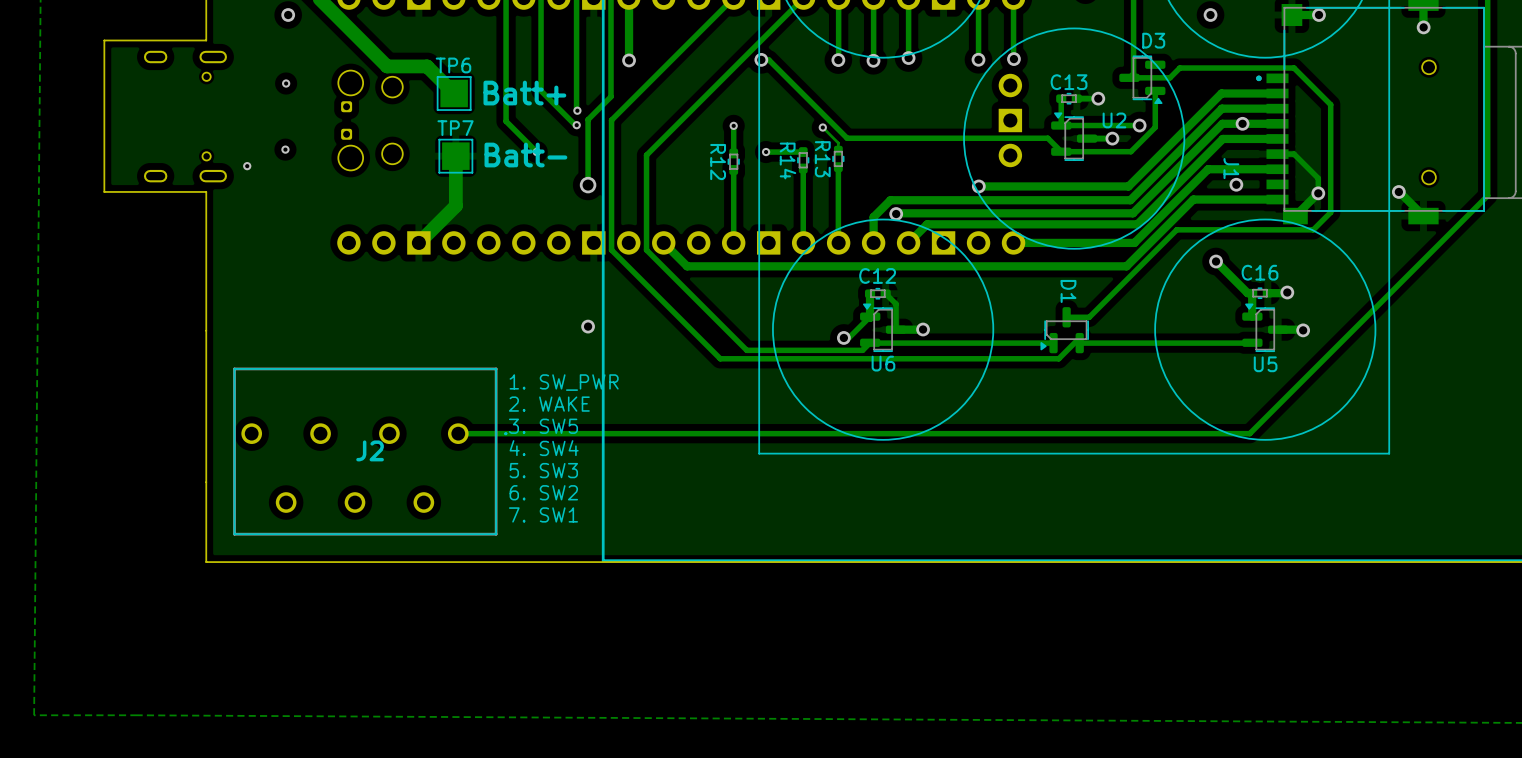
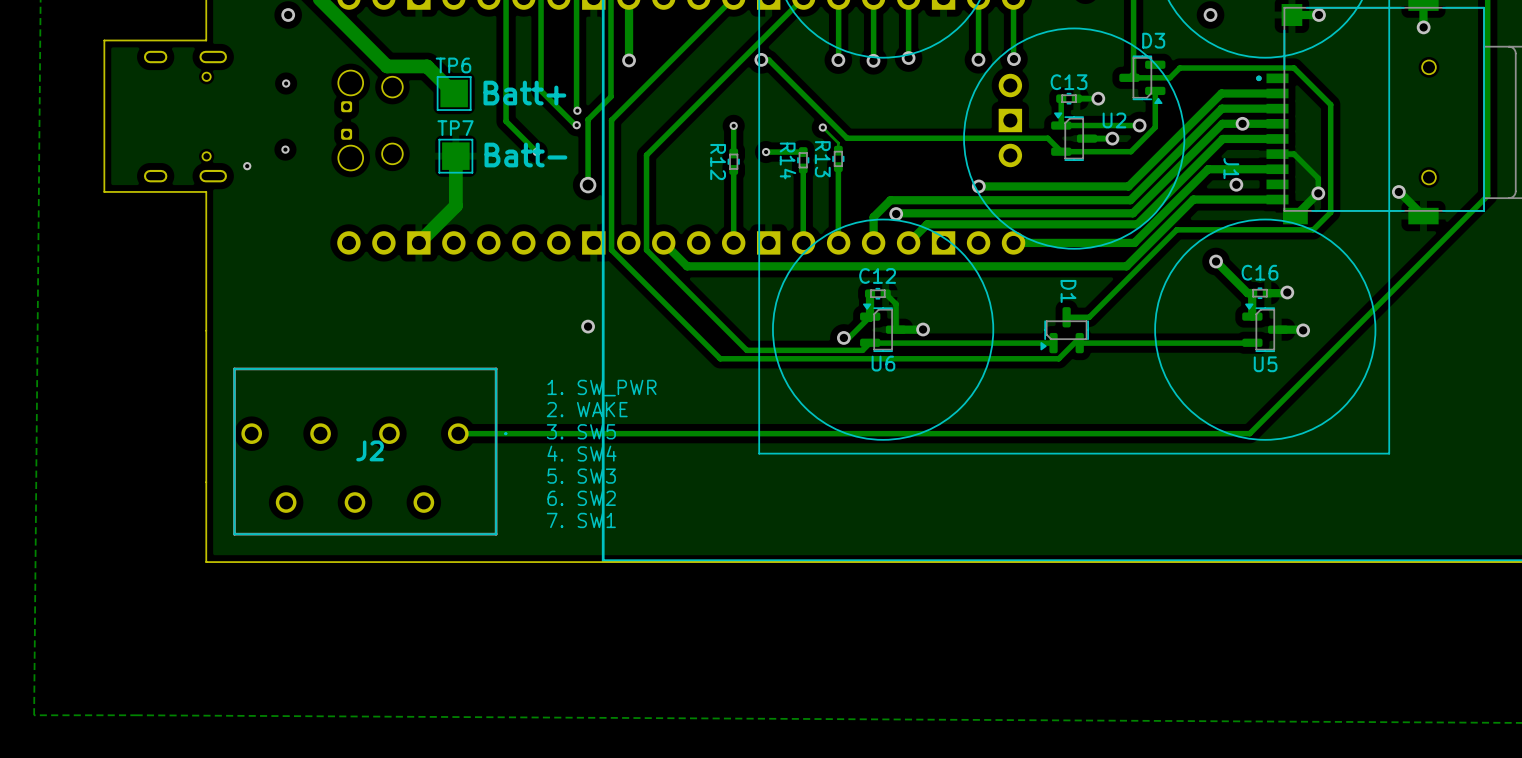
text position: 1. SW_PWR (564, 382) -> 1. SW_PWR (601, 388)
text position: 2. WAKE (549, 404) -> 2. WAKE (587, 409)
text position: 3. SW5 (543, 426) -> 3. SW5 (581, 431)
text position: 4. SW4 (544, 448) -> 4. SW4 (581, 453)
text position: 5. SW3 (543, 470) -> 5. SW3 (581, 476)
text position: 6. SW2 (543, 492) -> 6. SW2 (581, 498)
text position: 7. SW1 (543, 514) -> 7. SW1 (581, 520)

